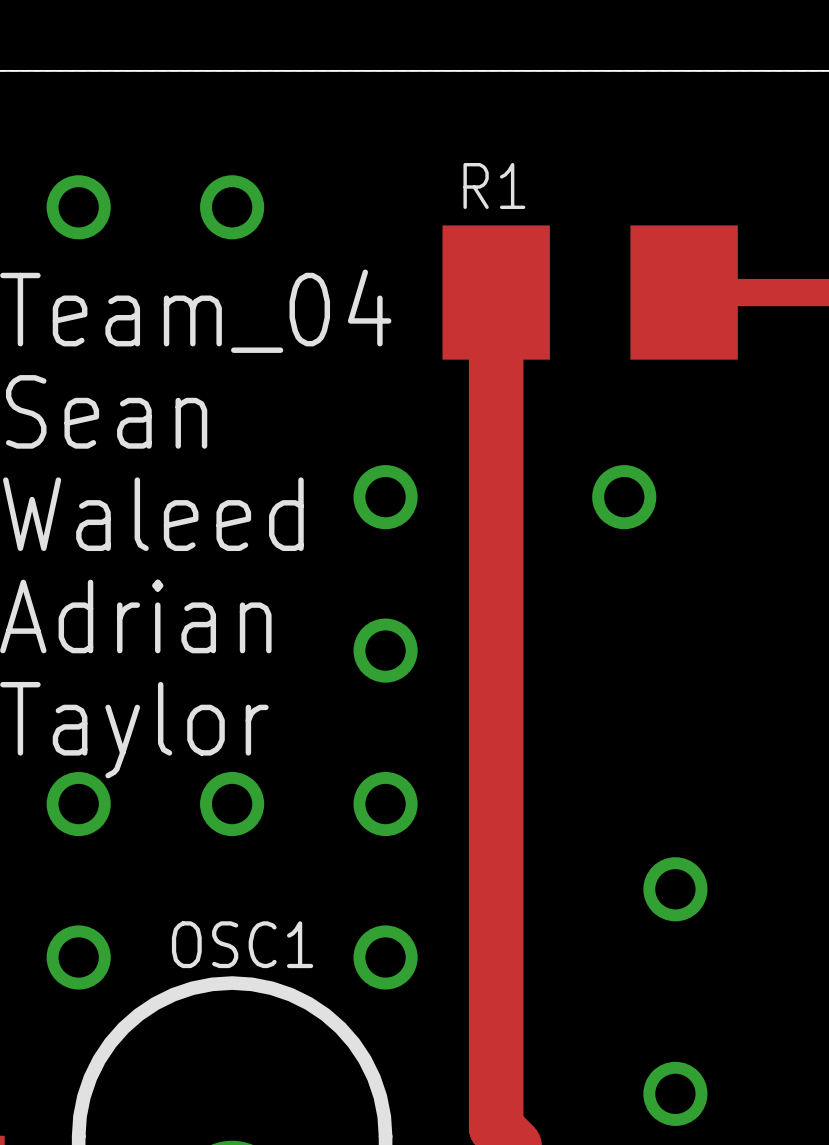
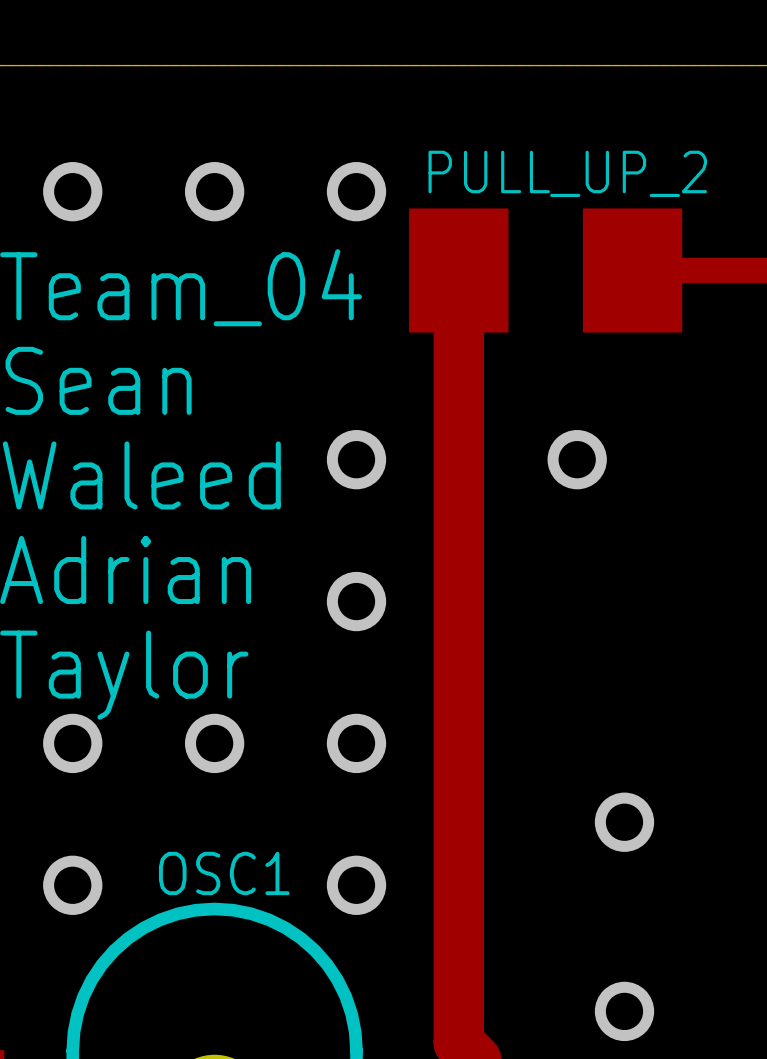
R1 name: R1 (494, 185) -> PULL_UP_2 (567, 173)
via: none -> (356, 191)

